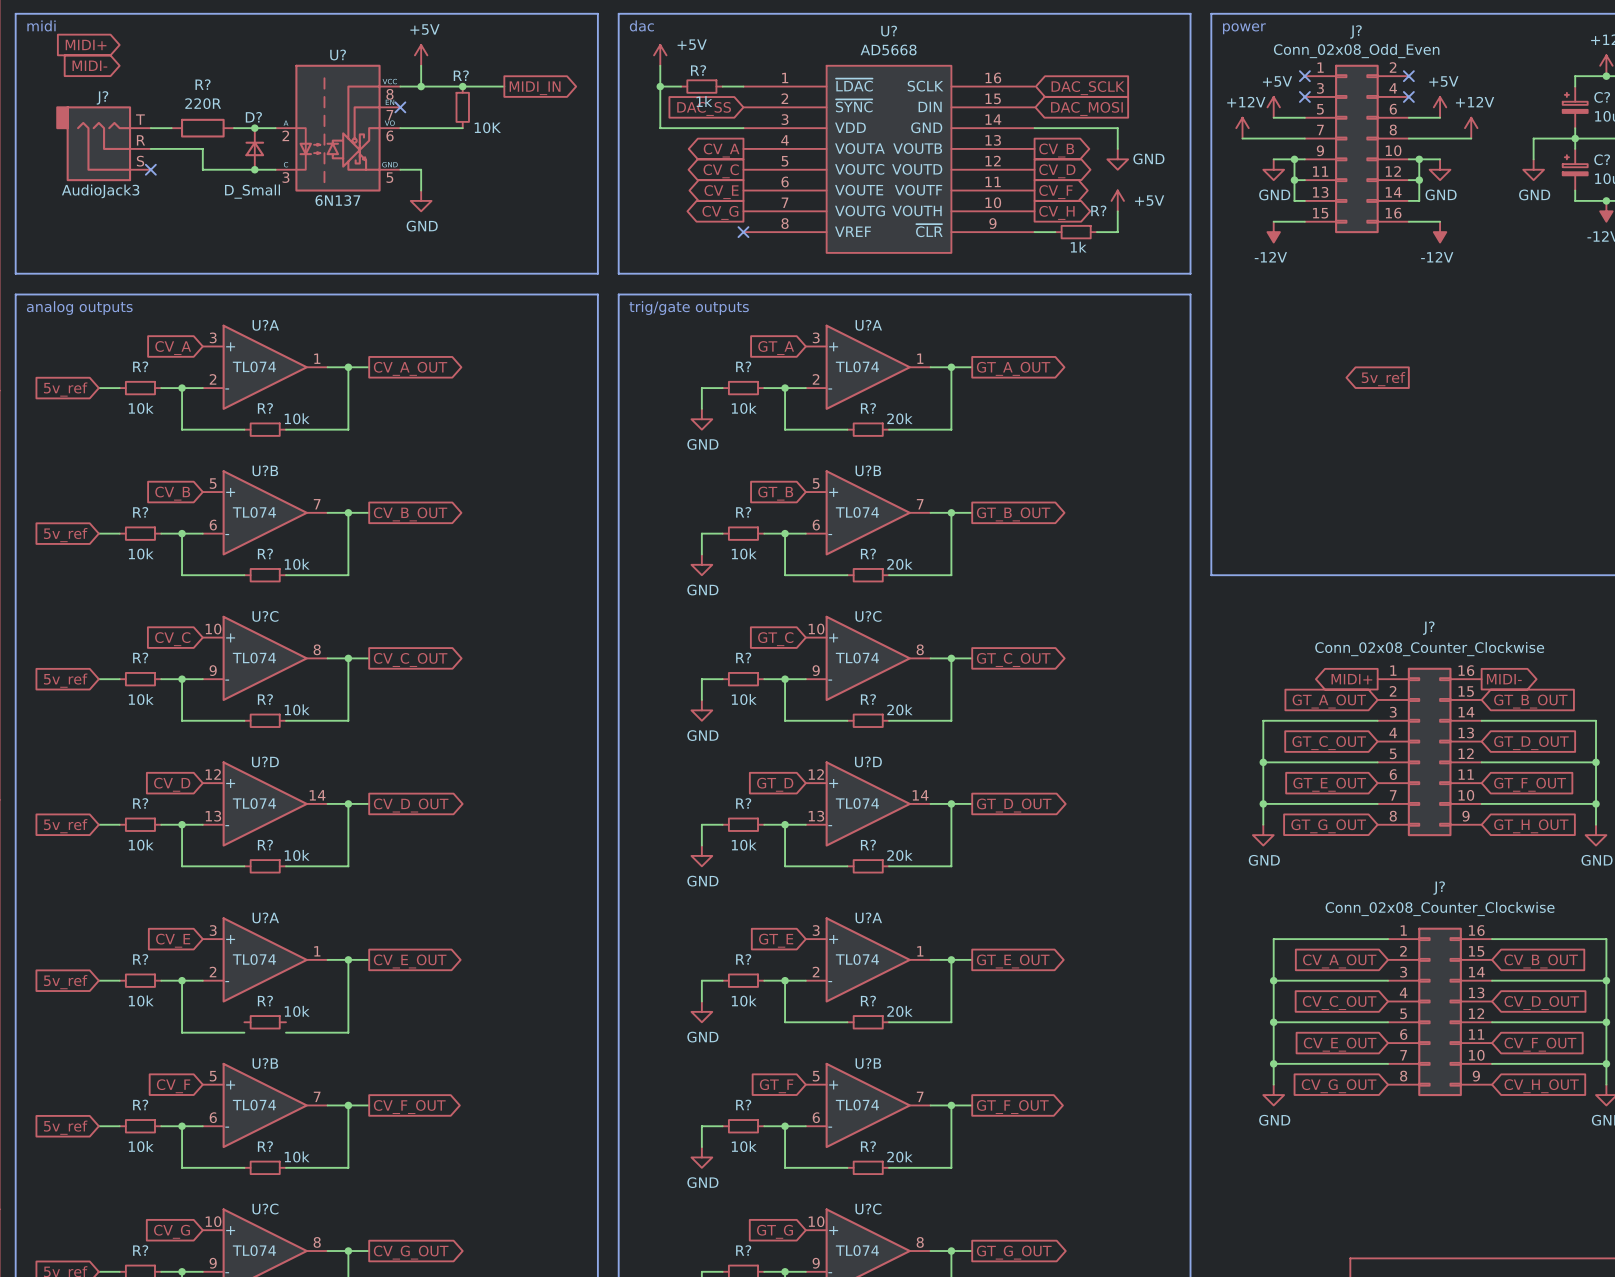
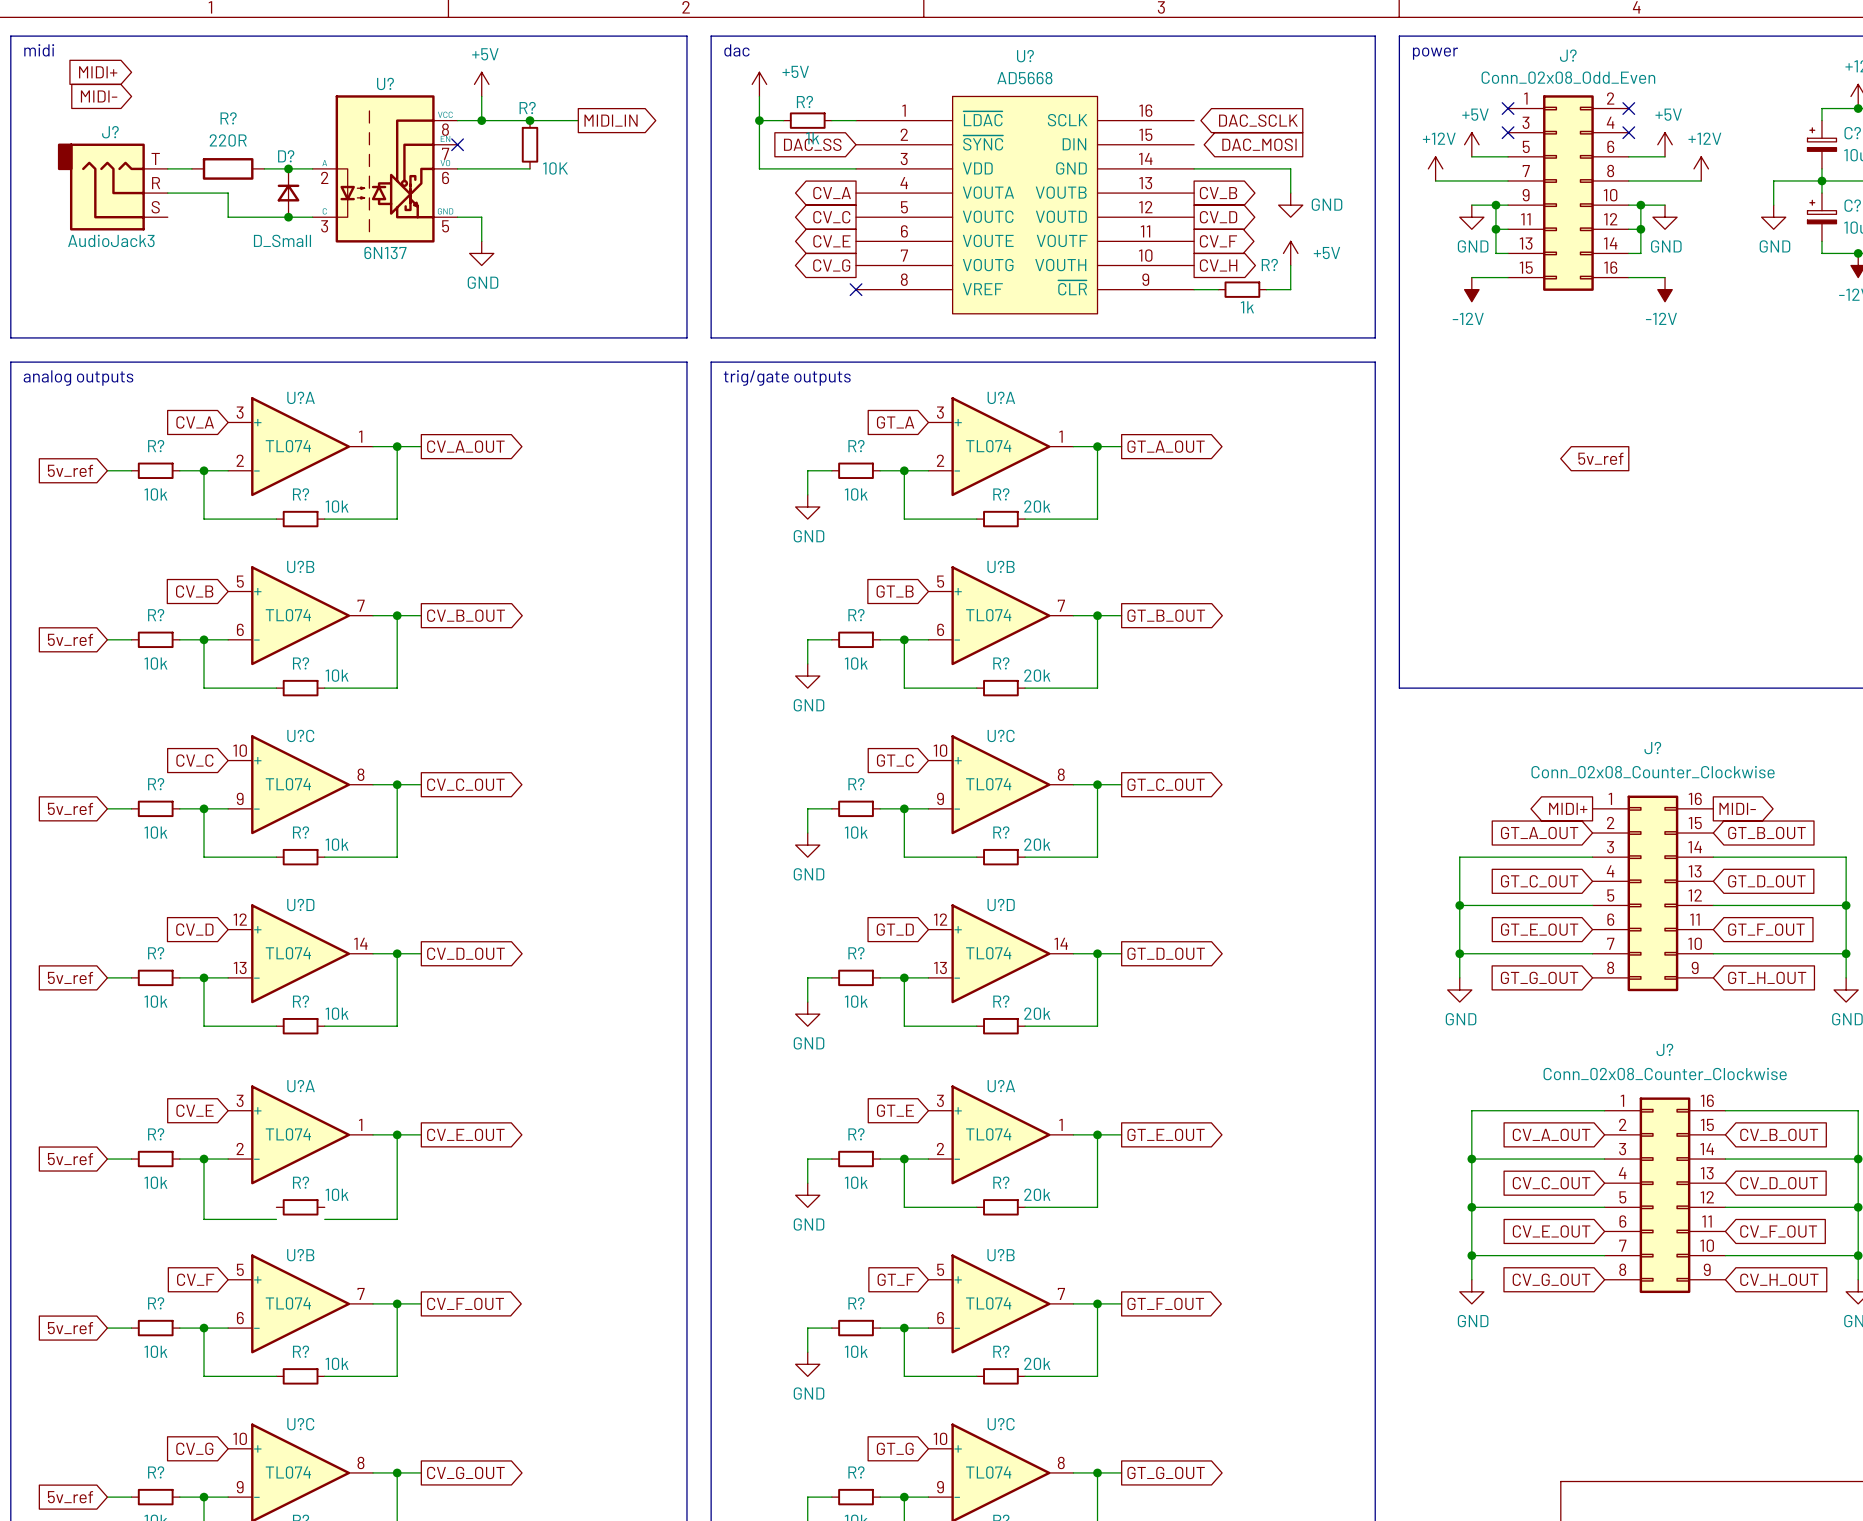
no-connect mark: (150, 169) -> none

